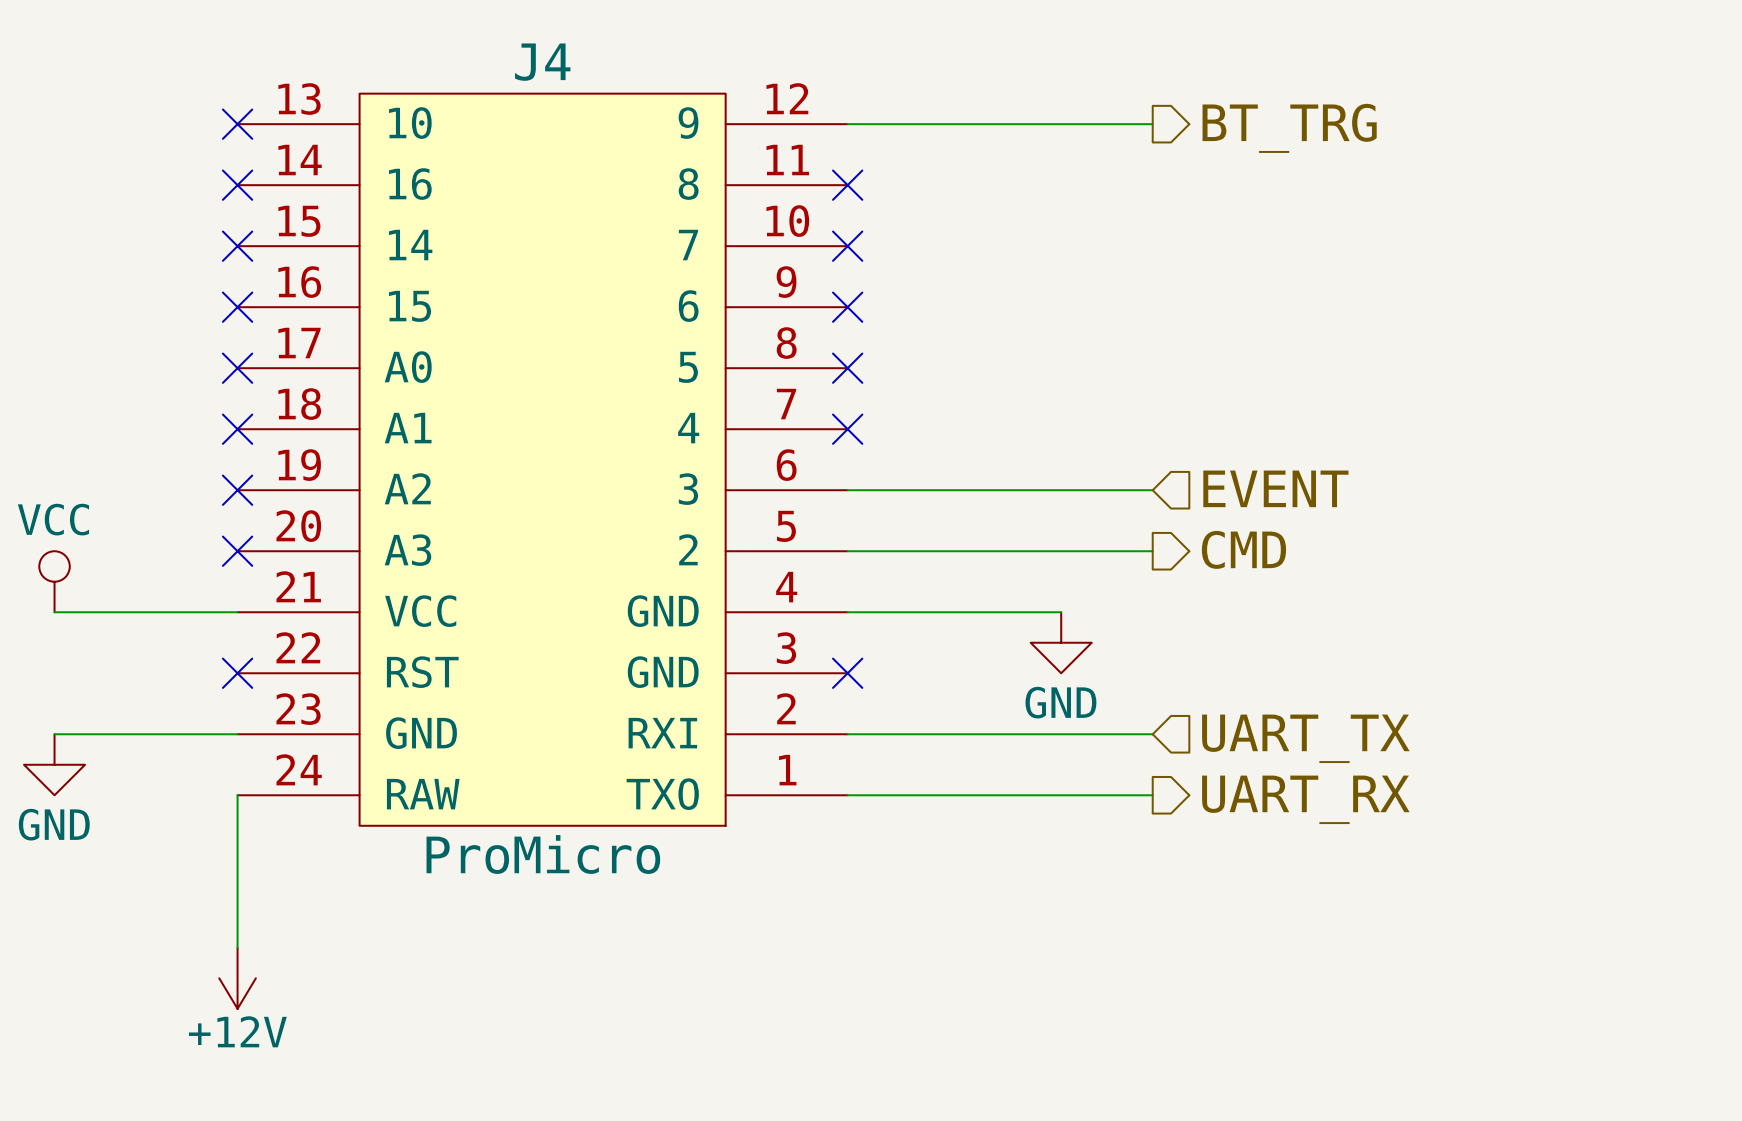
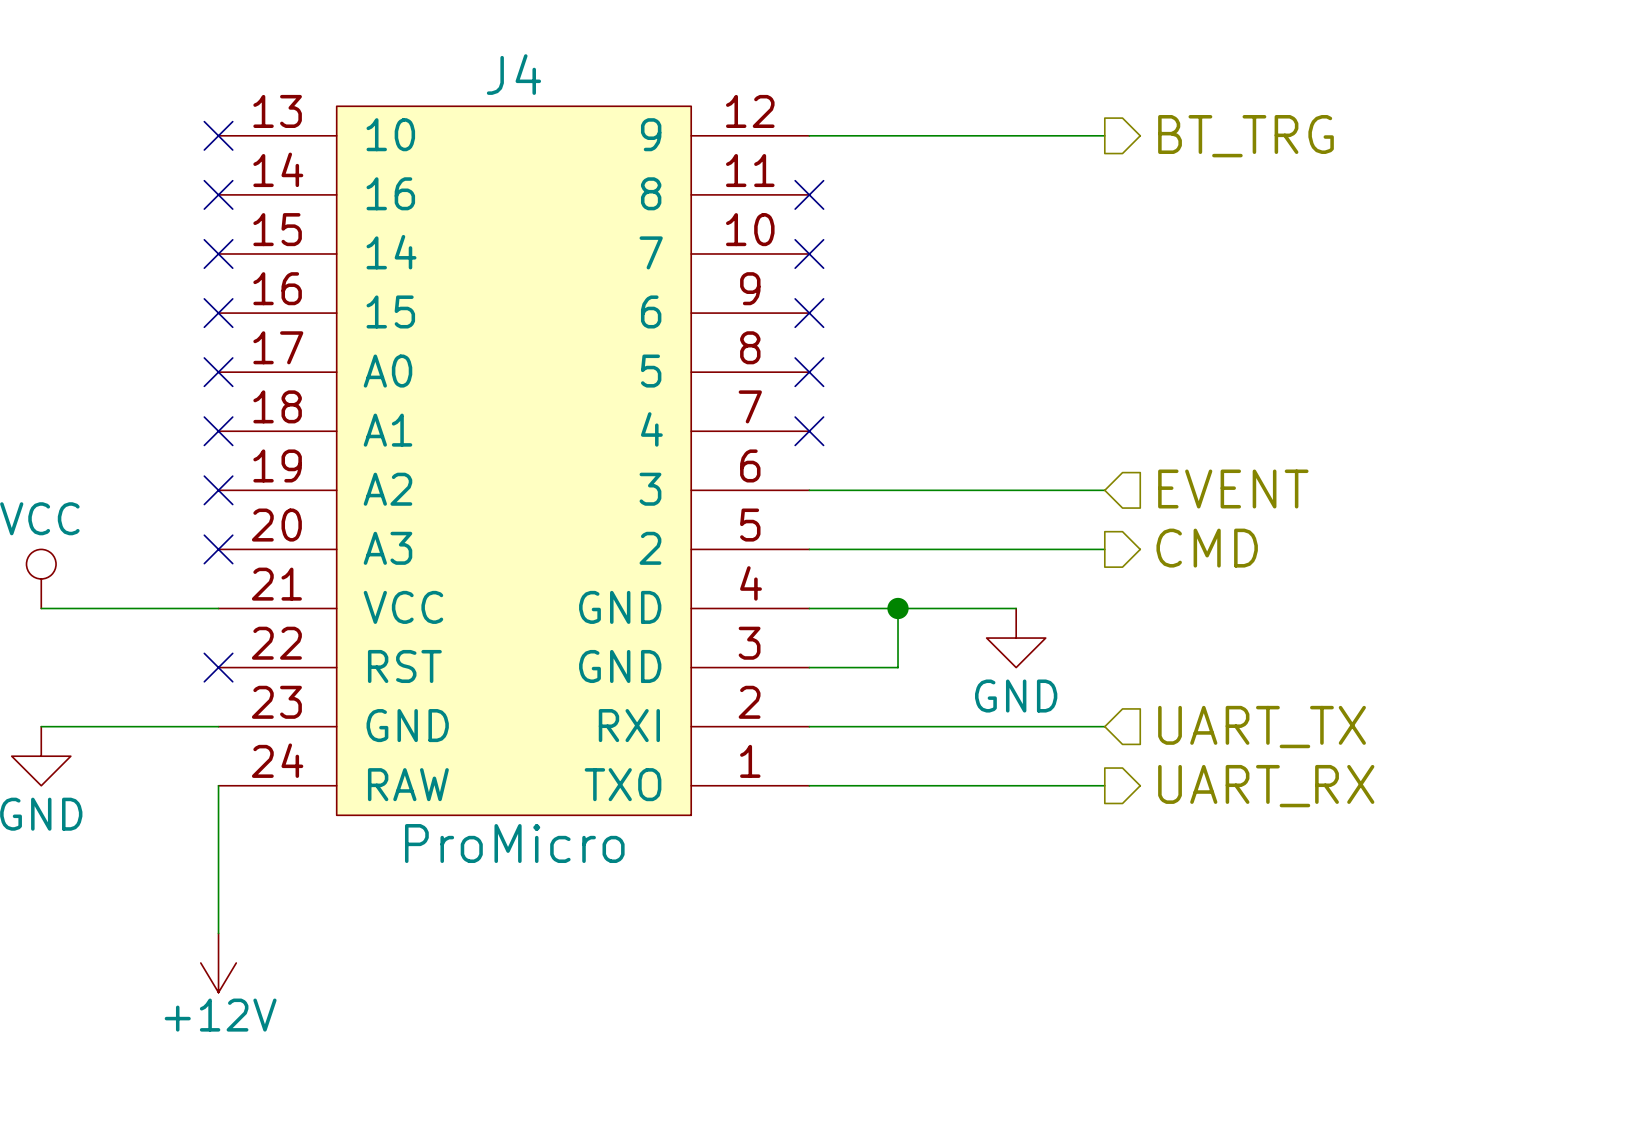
wire: none -> (898, 608) (898, 667) (809, 667)
junction: none -> (898, 608)
no-connect mark: (847, 673) -> none

